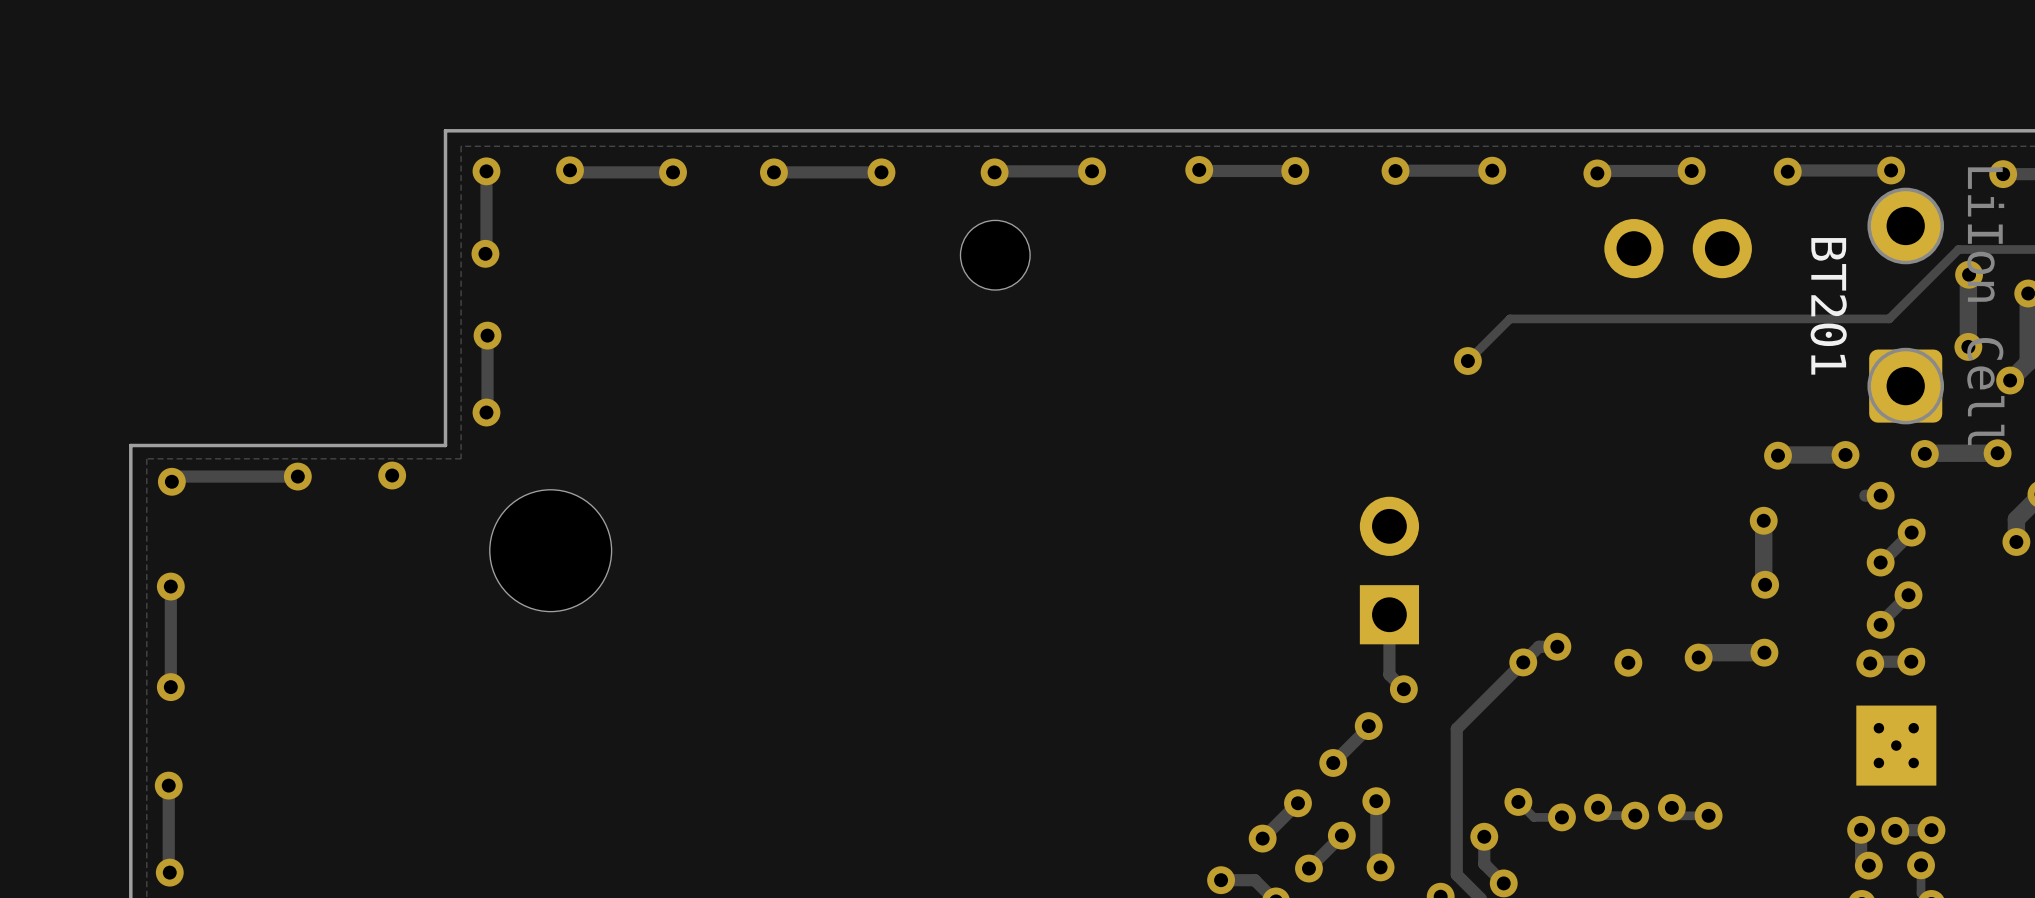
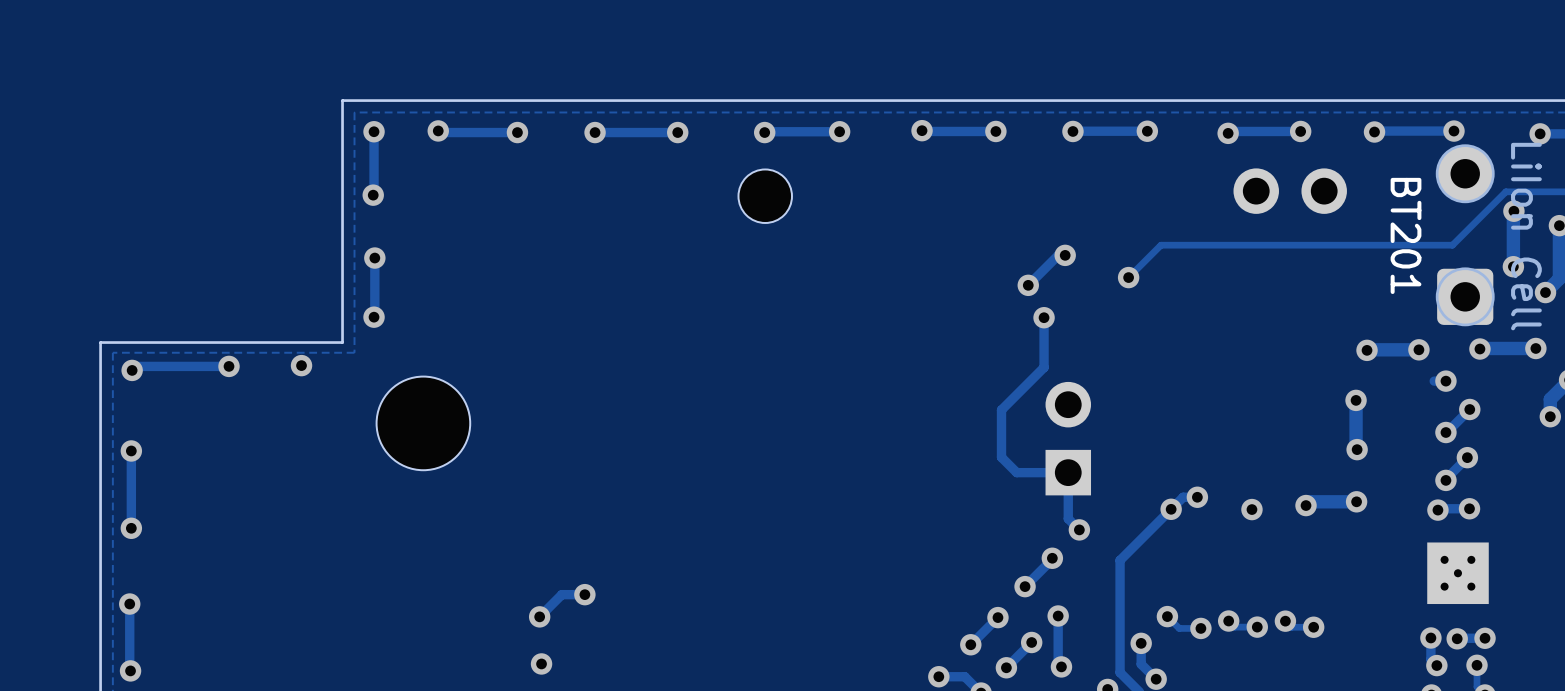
track: none -> (1065, 255) (1058, 255) (1028, 285)
via: none -> (1065, 255)
via: none -> (1028, 285)
track: none -> (1044, 317) (1044, 367) (1001, 410) (1001, 457) (1016, 472) (1068, 472)
via: none -> (1044, 317)
track: none -> (584, 594) (561, 594) (539, 616)
via: none -> (584, 594)
via: none -> (539, 616)
via: none -> (541, 663)

